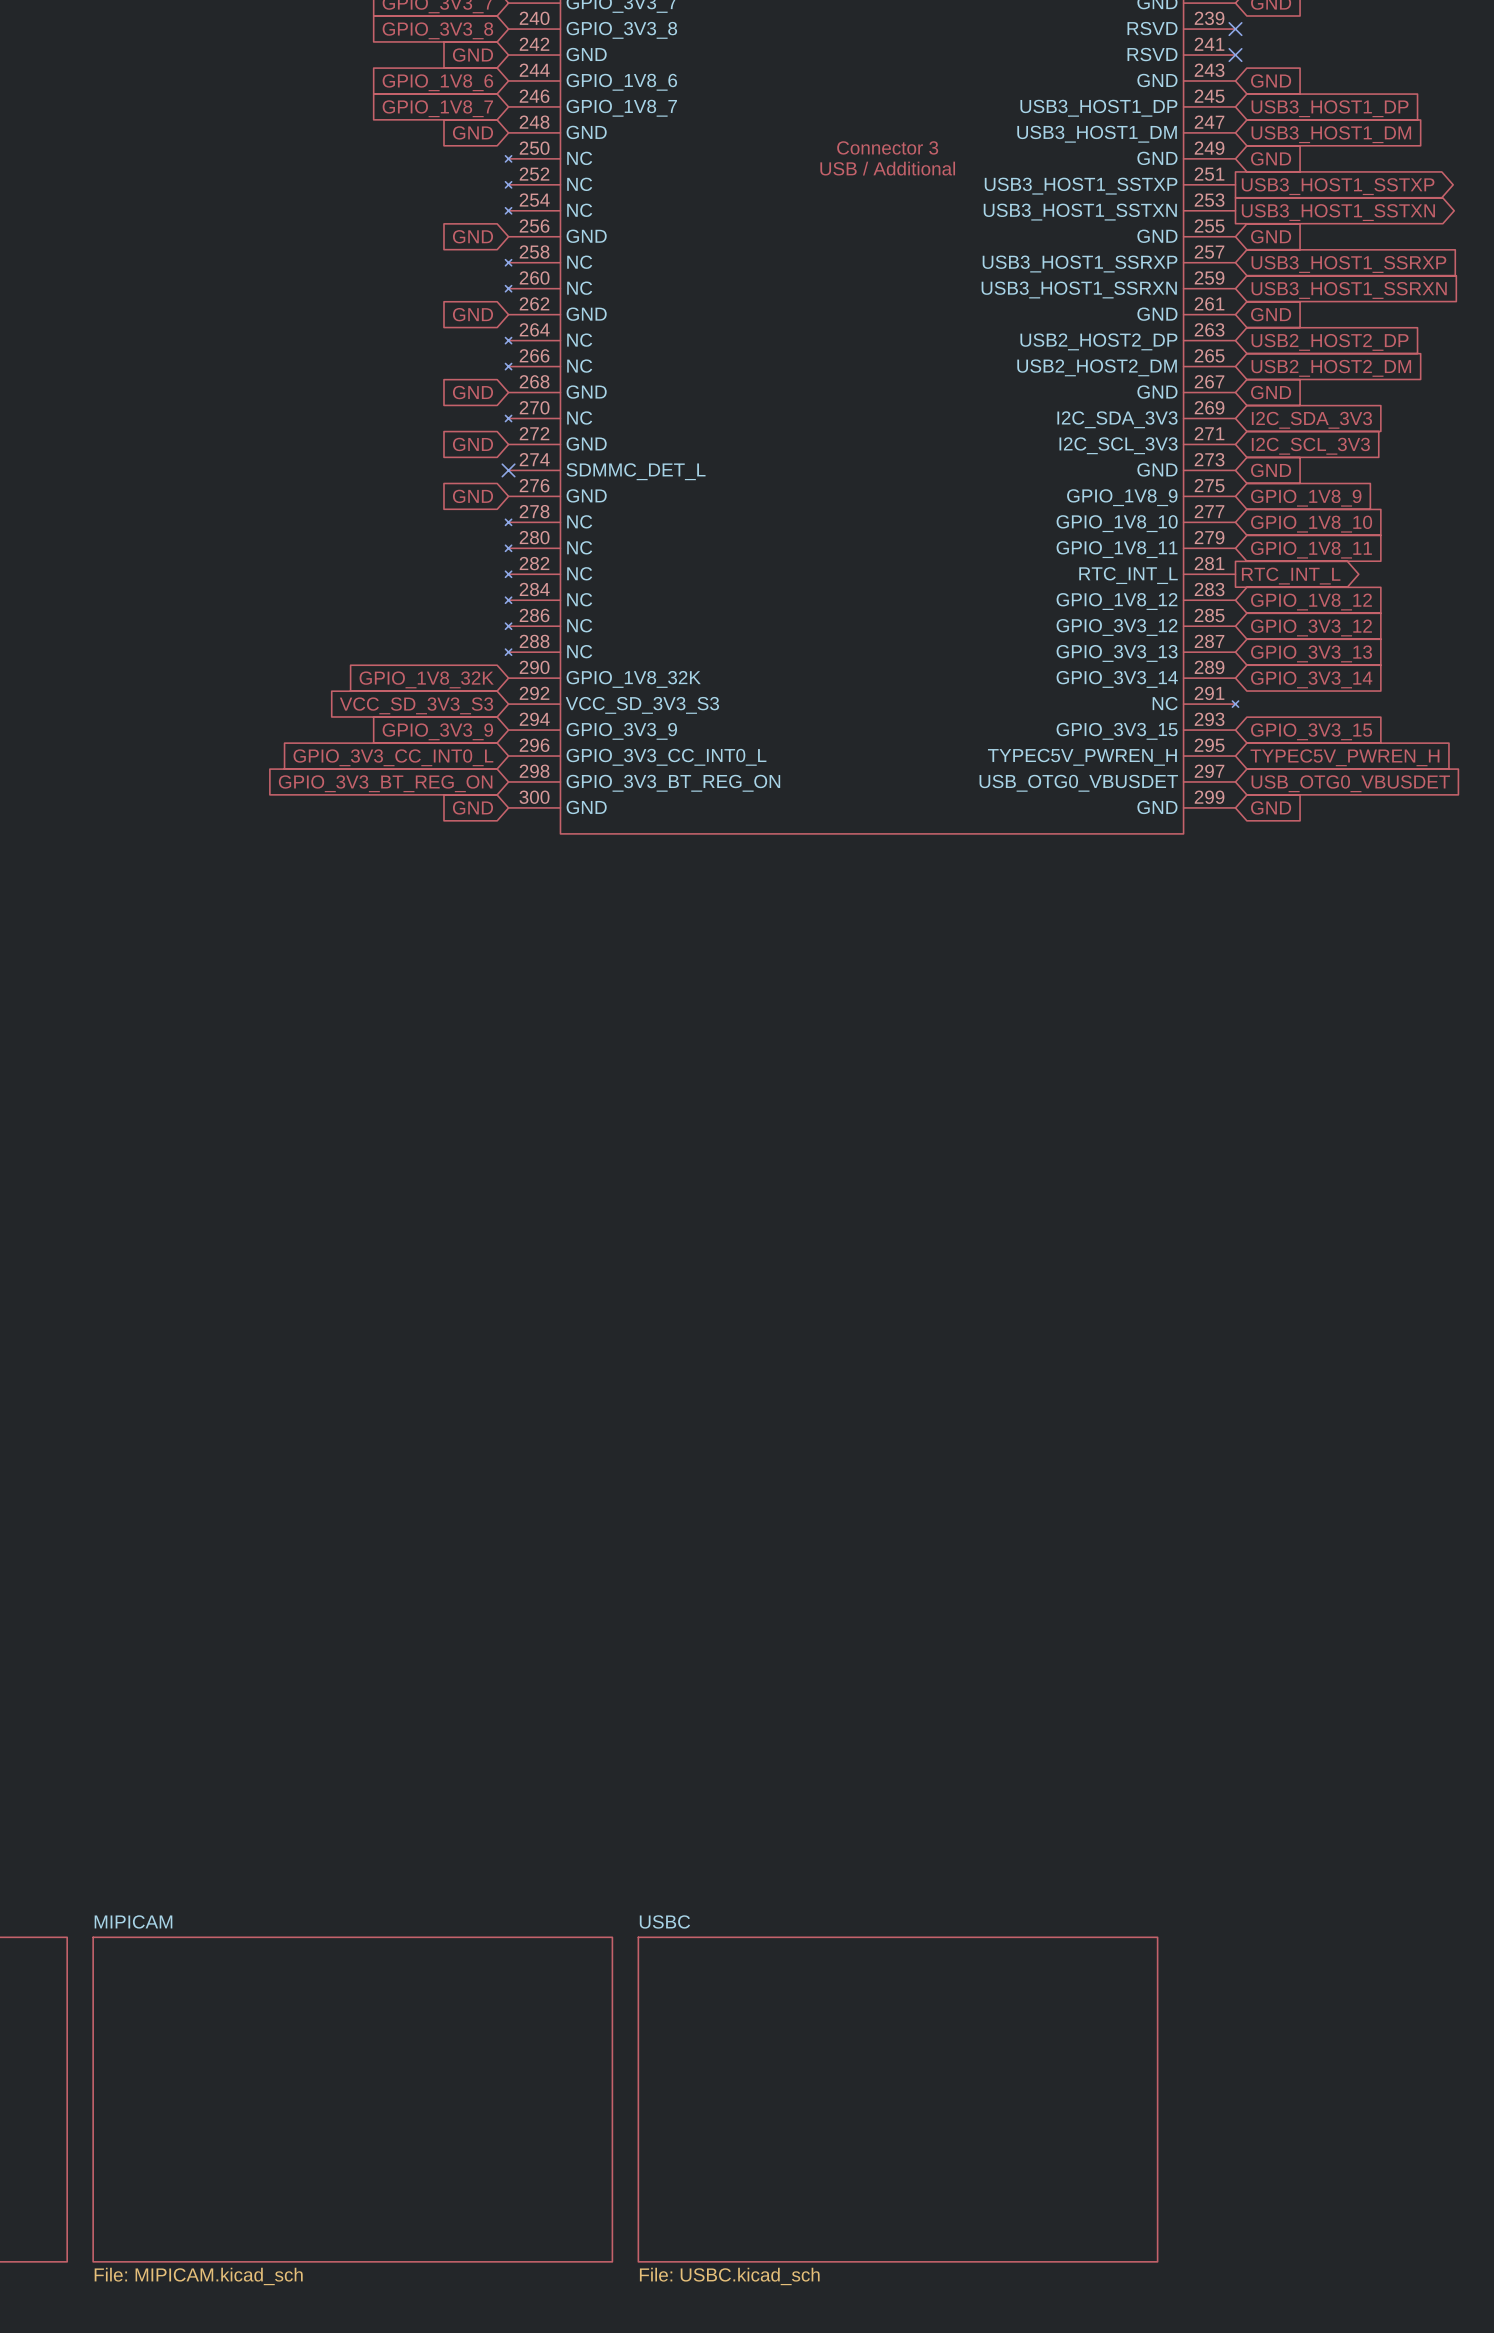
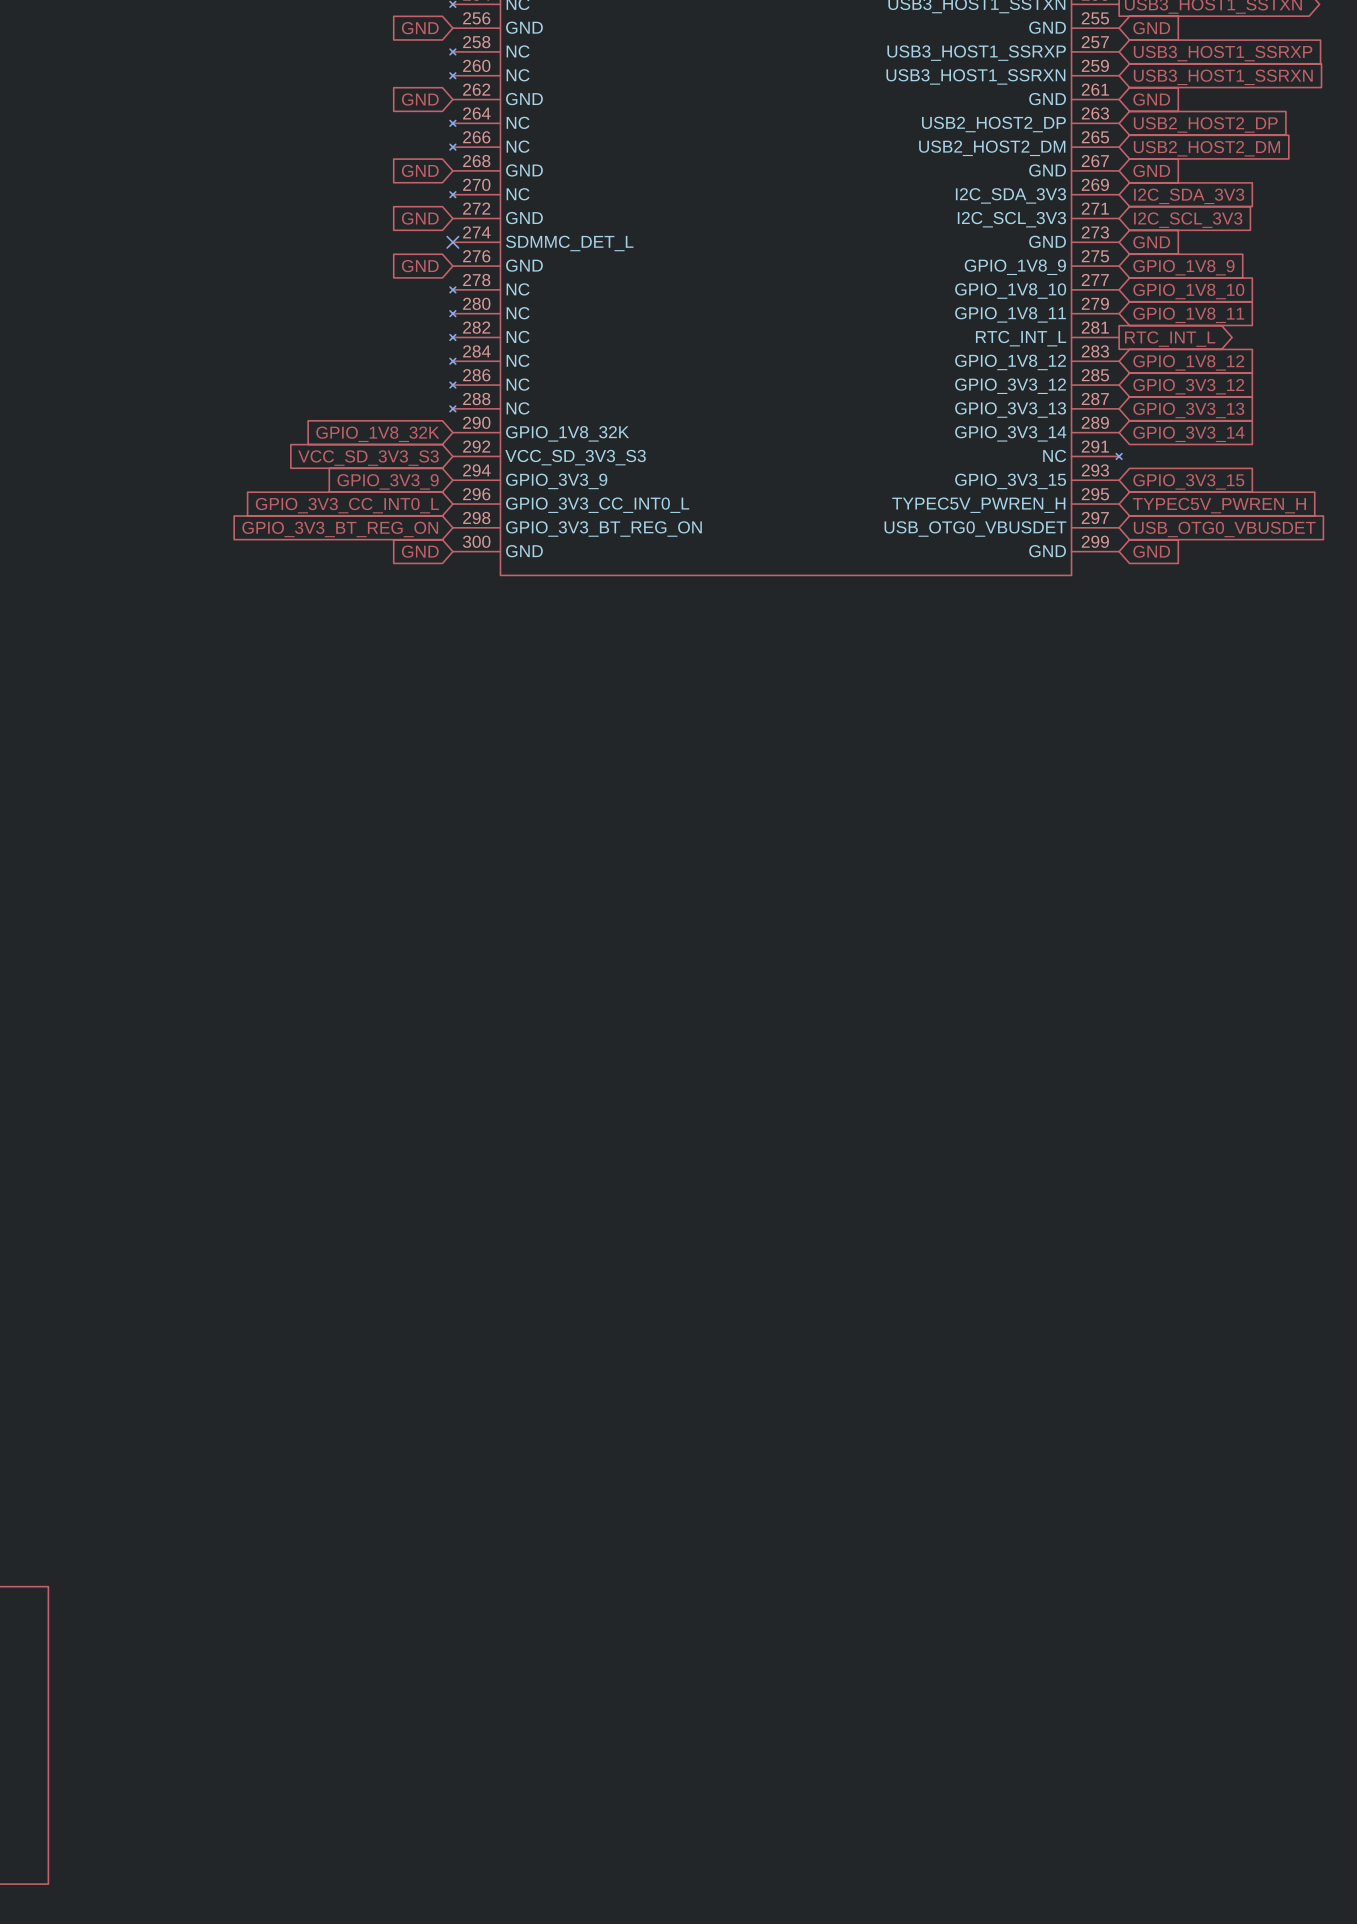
sheet MIPICAM: File: MIPICAM.kicad_sch (352, 2099) -> none
sheet USBC: File: USBC.kicad_sch (897, 2099) -> none

